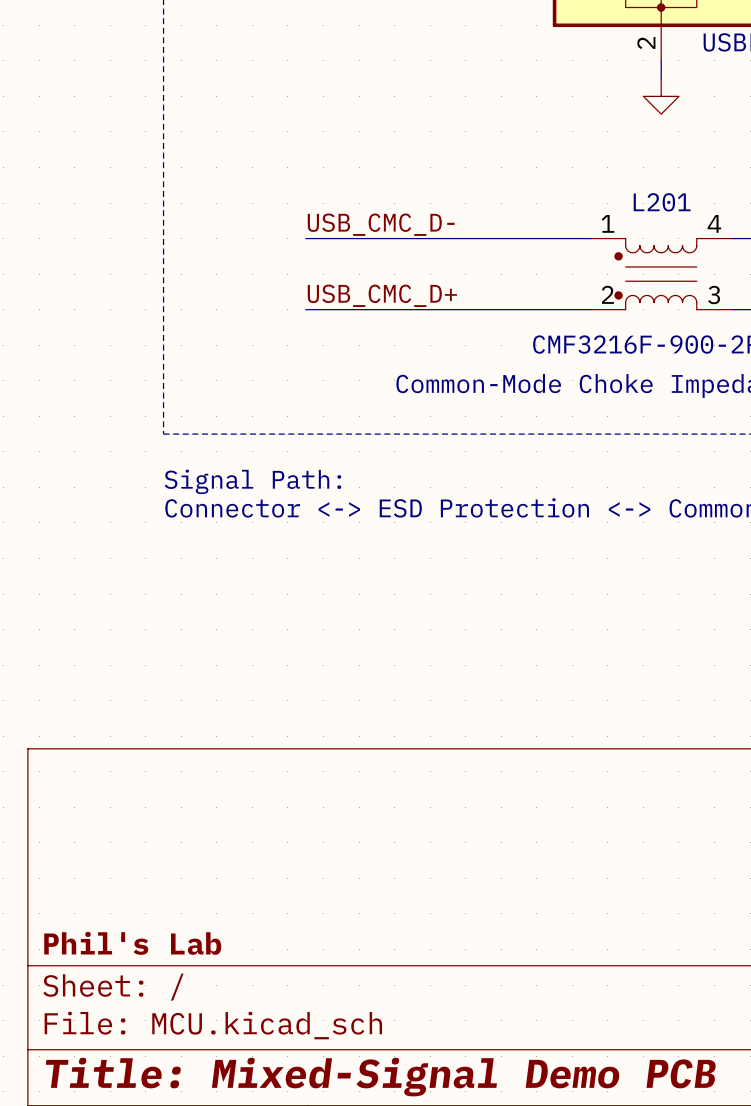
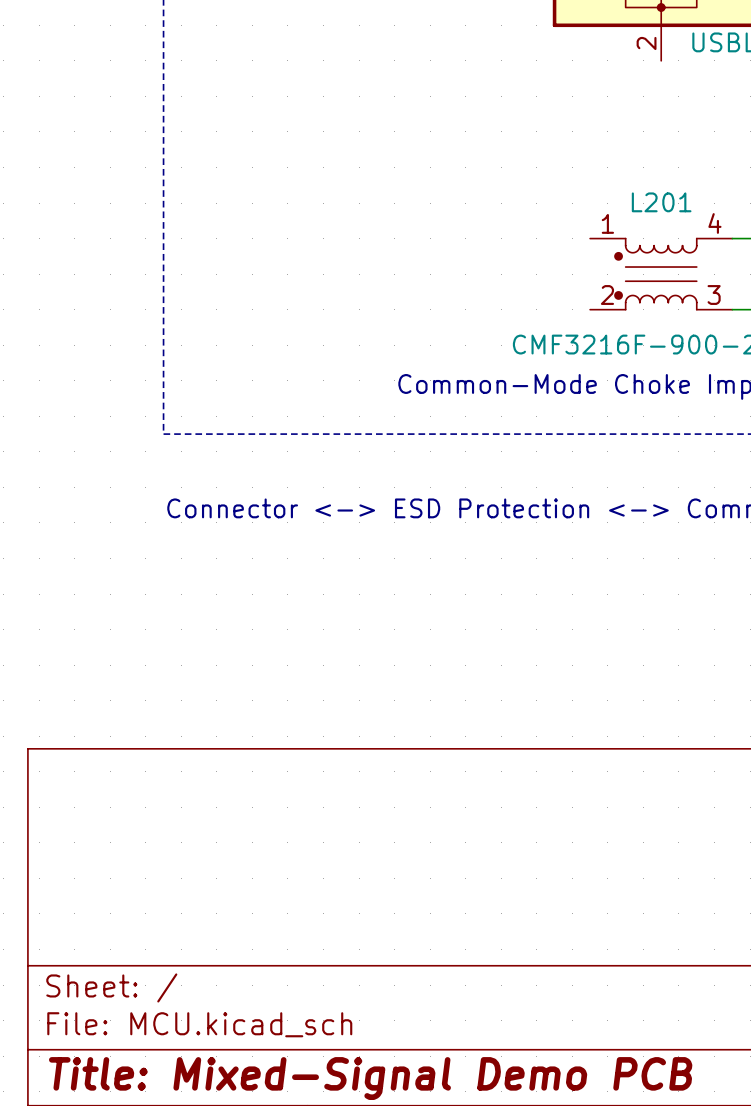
wire: (661, 60) (661, 78) -> none
power symbol: (661, 96) -> none
label: USB_CMC_D- (381, 224) -> none
wire: (305, 238) (590, 238) -> none
label: USB_CMC_D+ (382, 295) -> none
wire: (305, 309) (590, 309) -> none
text: Signal Path: (252, 481) -> none
title block: Phil's Lab (132, 943) -> none

